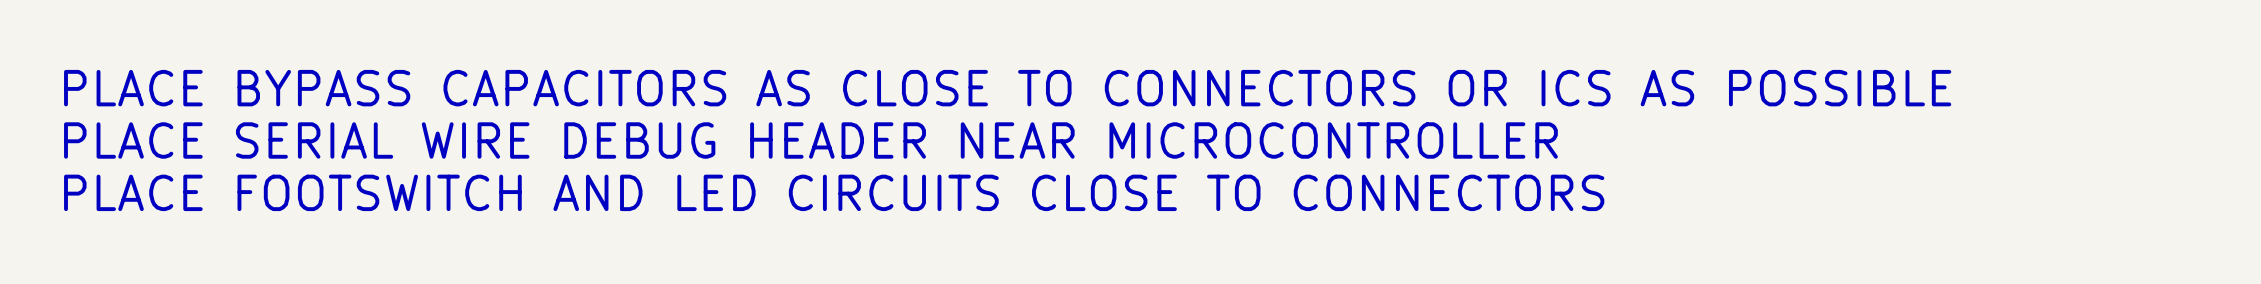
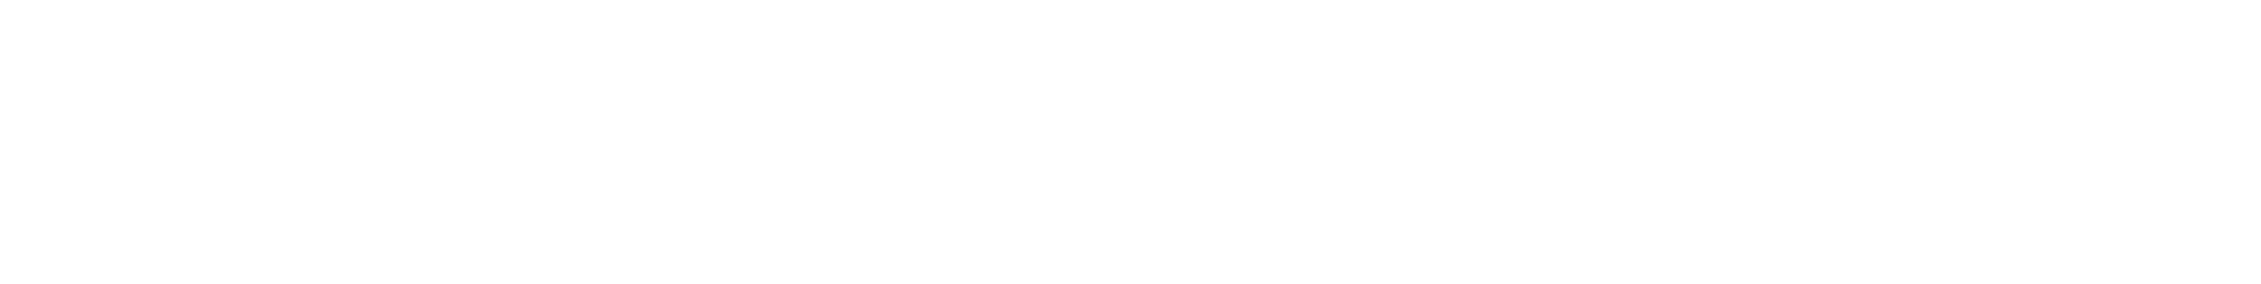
text: PLACE BYPASS CAPACITORS AS CLOSE TO CONNECTORS OR ICS AS POSSIBLE (1007, 88) -> none
text: PLACE SERIAL WIRE DEBUG HEADER NEAR MICROCONTROLLER (810, 140) -> none
text: PLACE FOOTSWITCH AND LED CIRCUITS CLOSE TO CONNECTORS (834, 192) -> none

